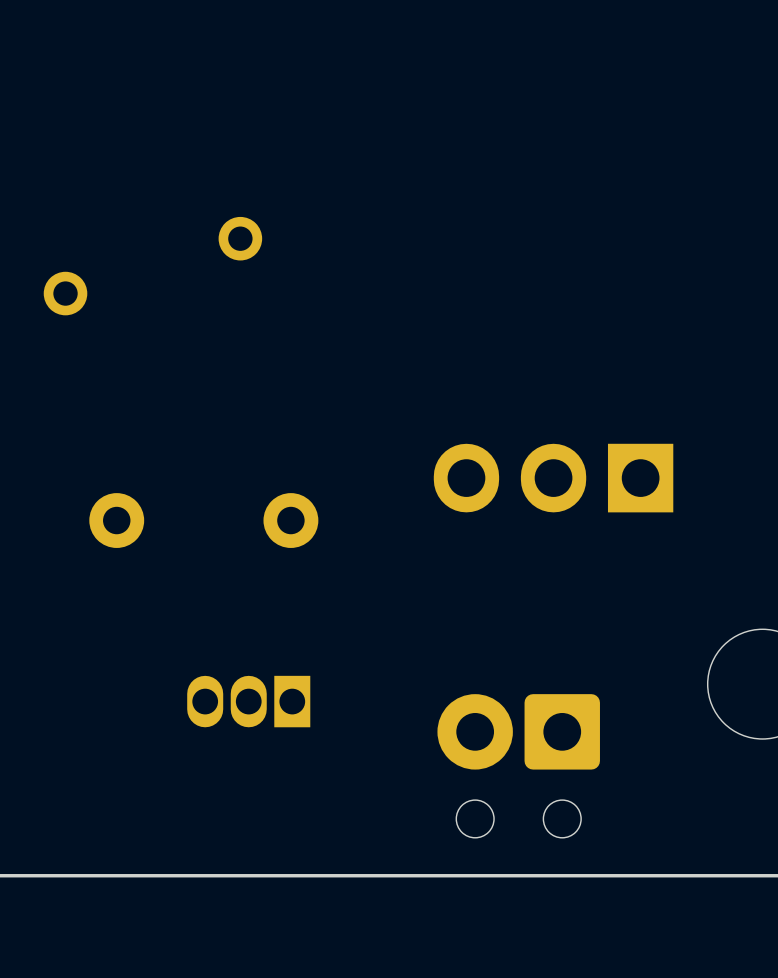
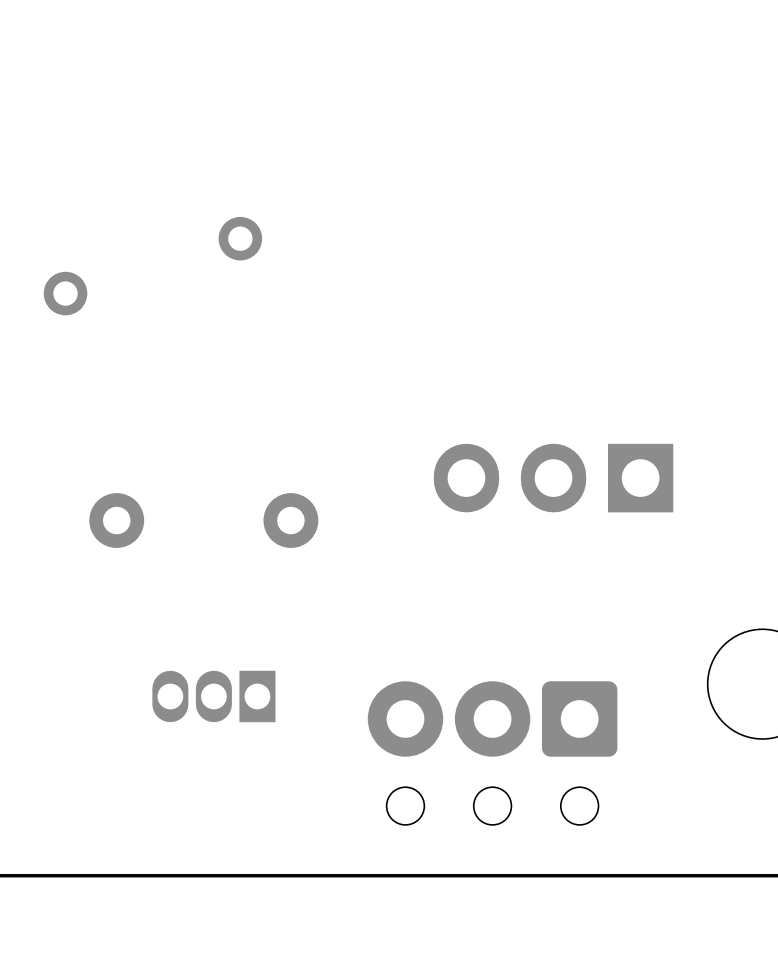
part footprint: [437, 694, 600, 838] -> [367, 681, 618, 825]
part position: (248, 701) -> (213, 696)

